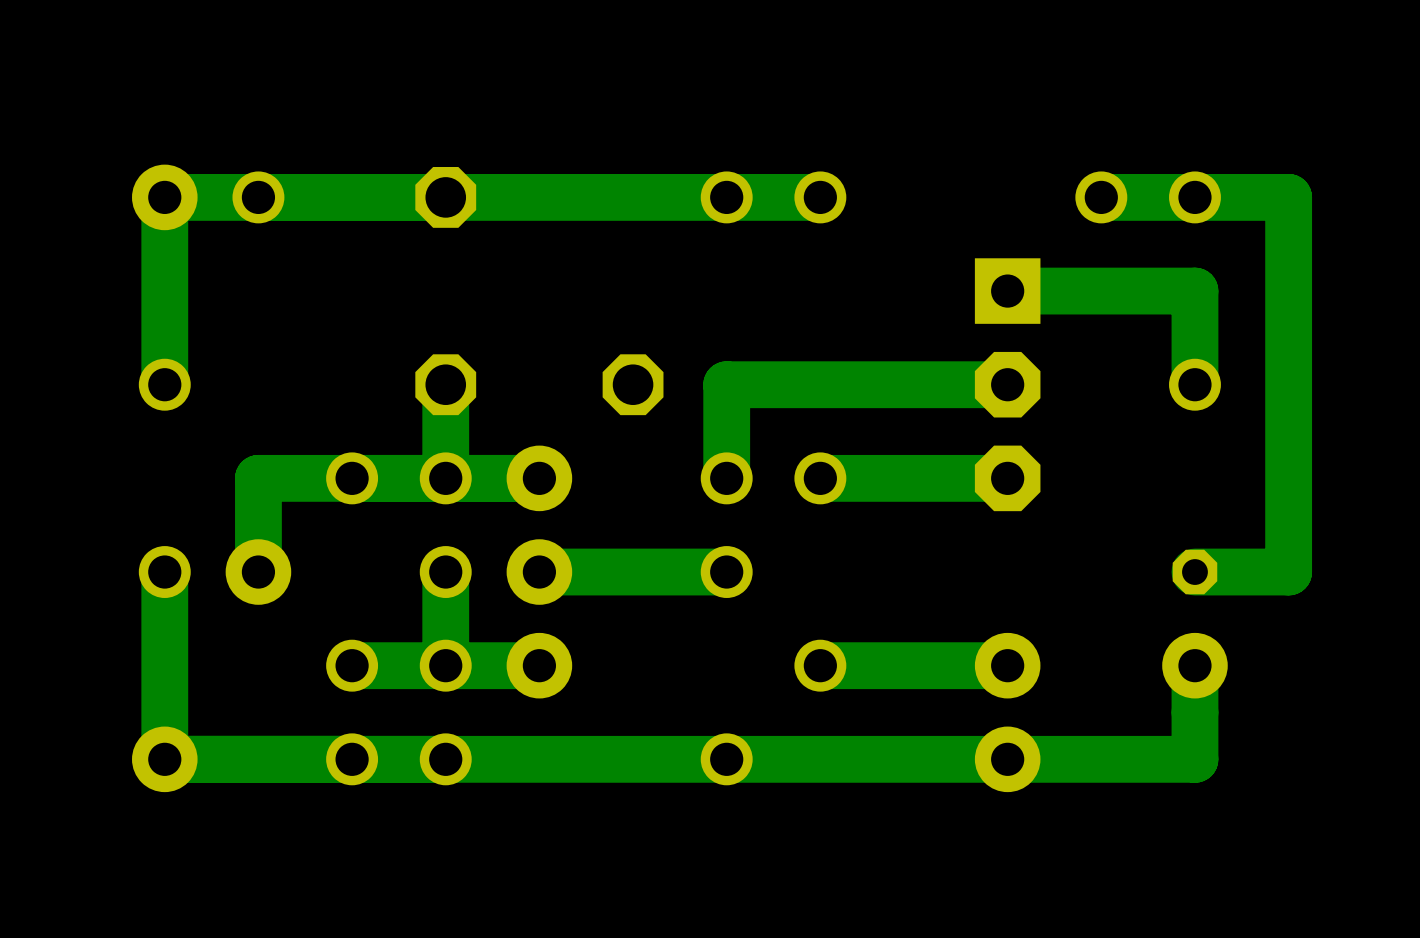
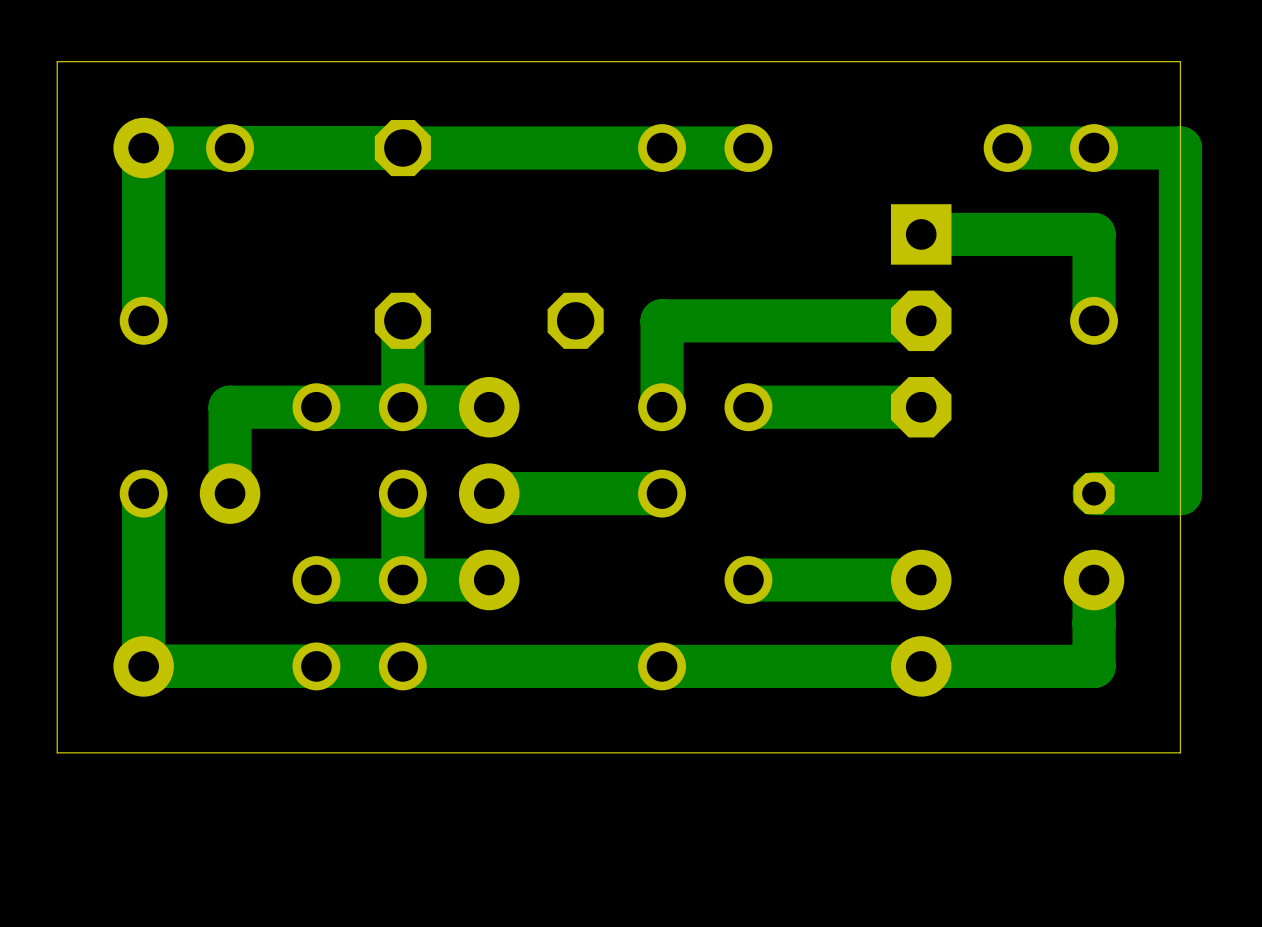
board edge: none -> (1180, 61) (1180, 752) (57, 752) (57, 61) (1180, 61)

